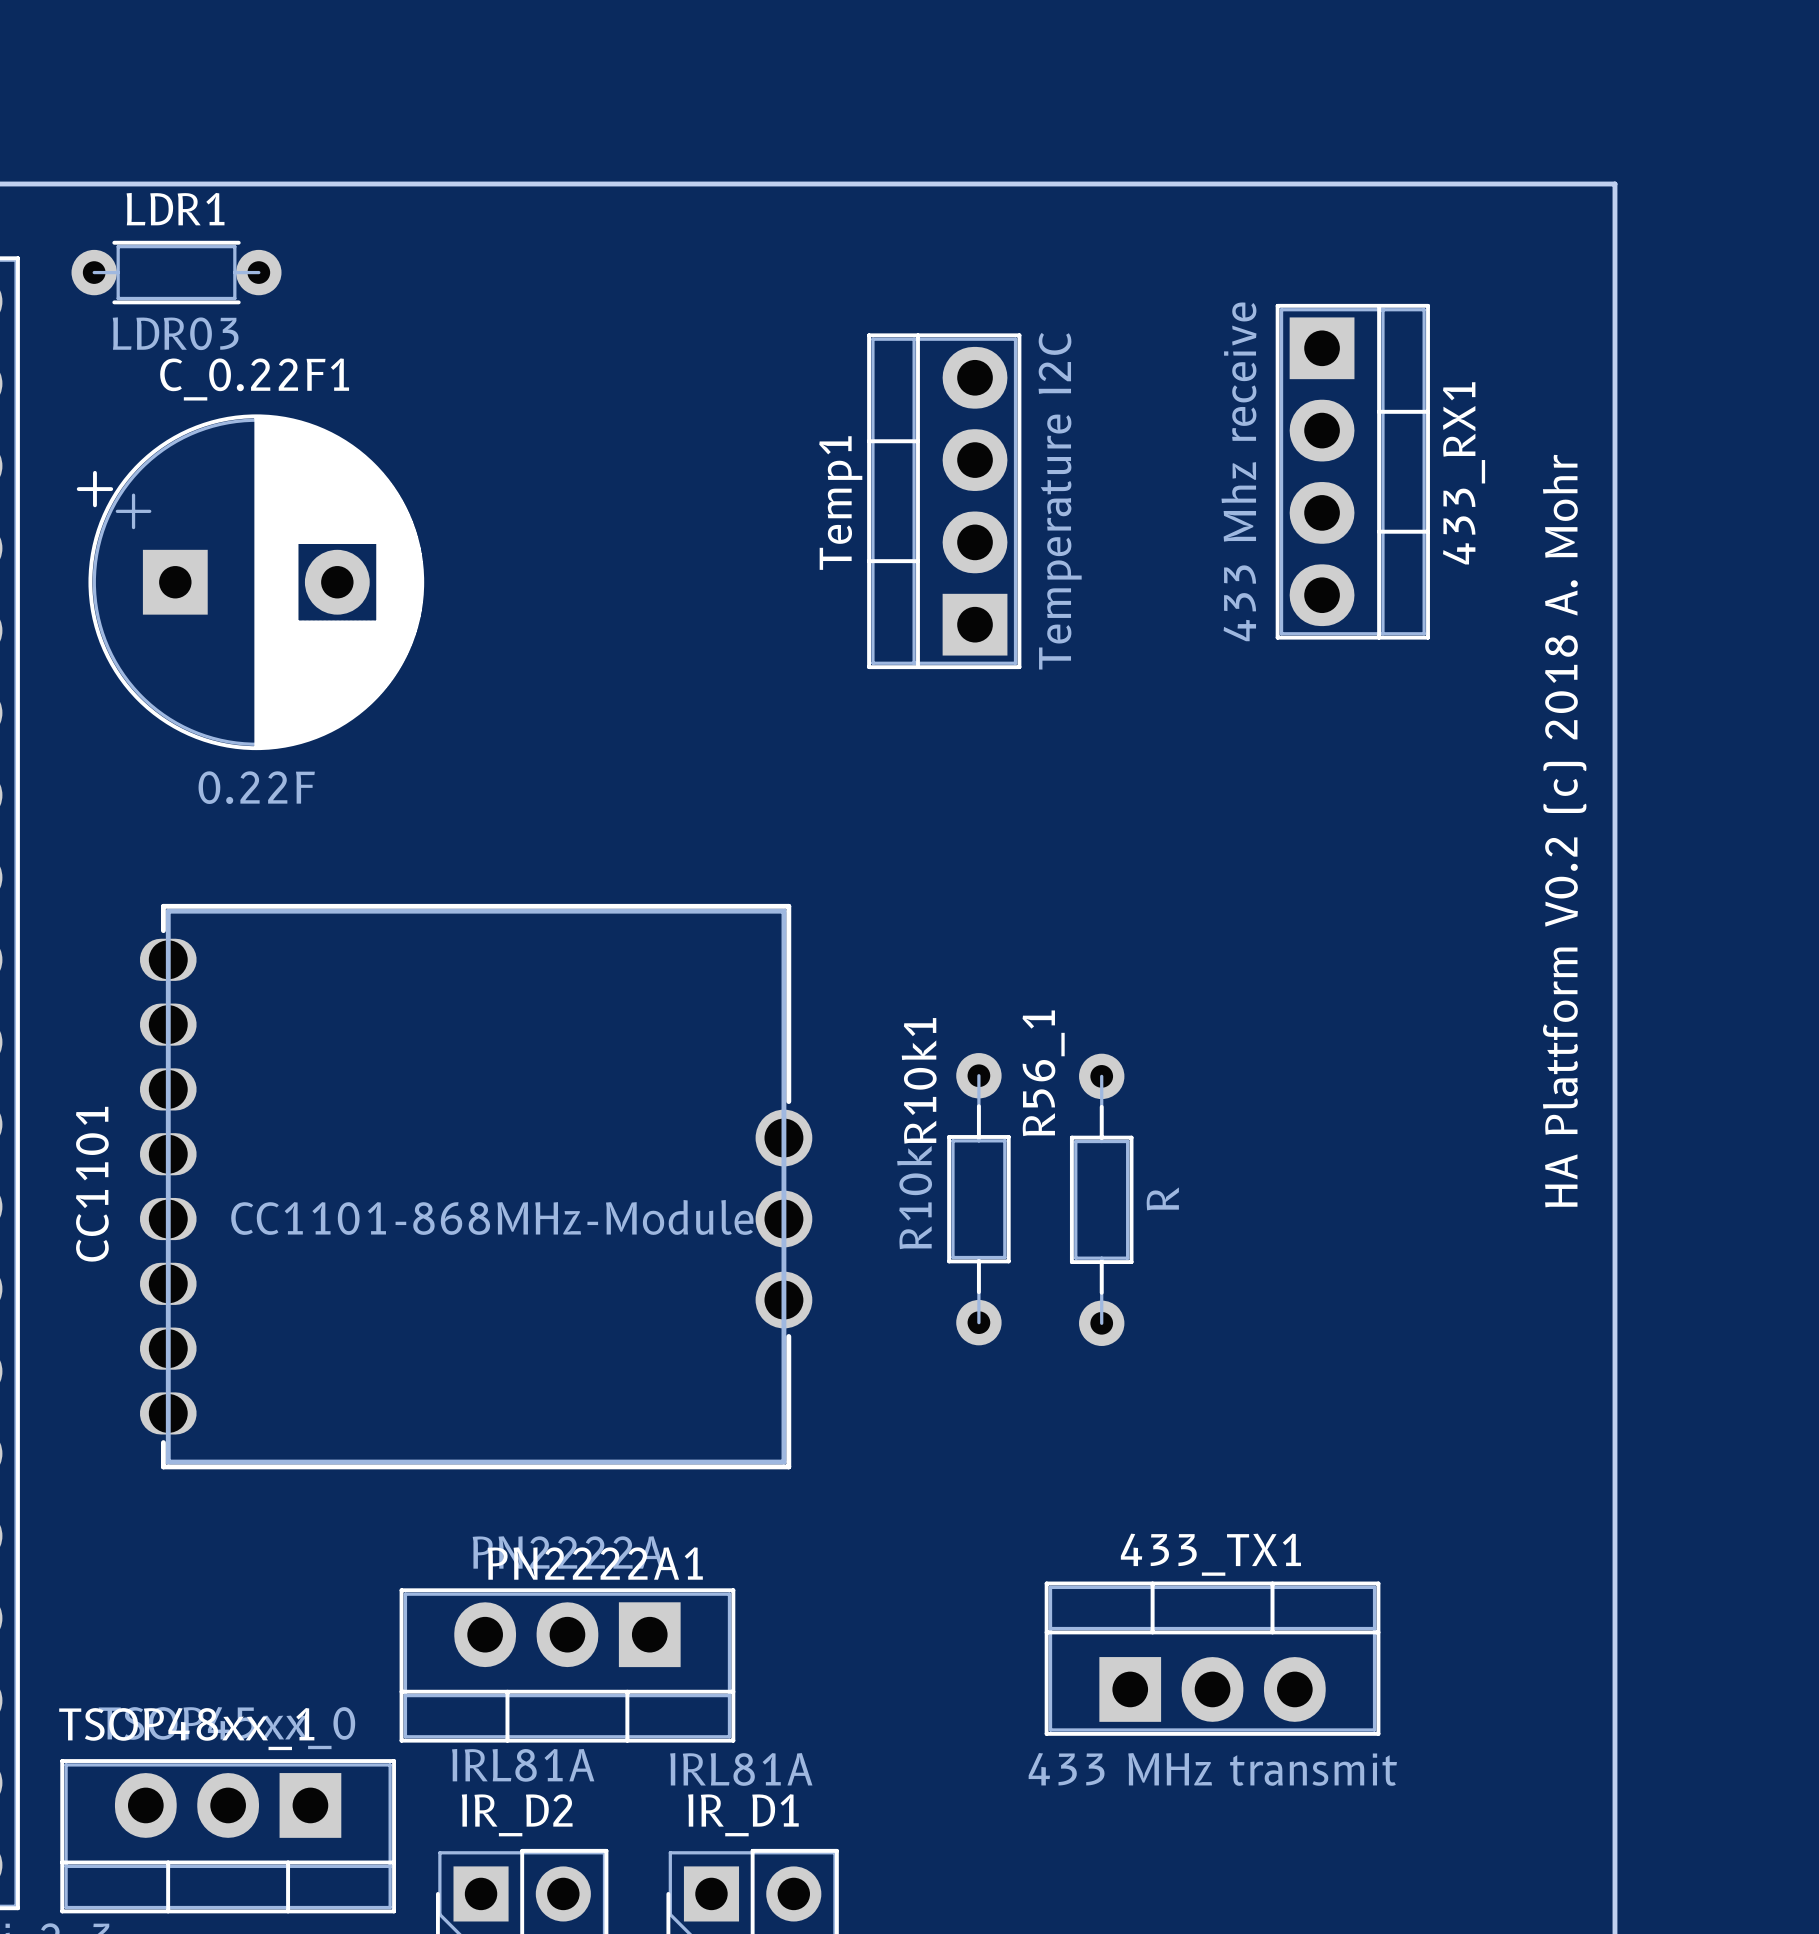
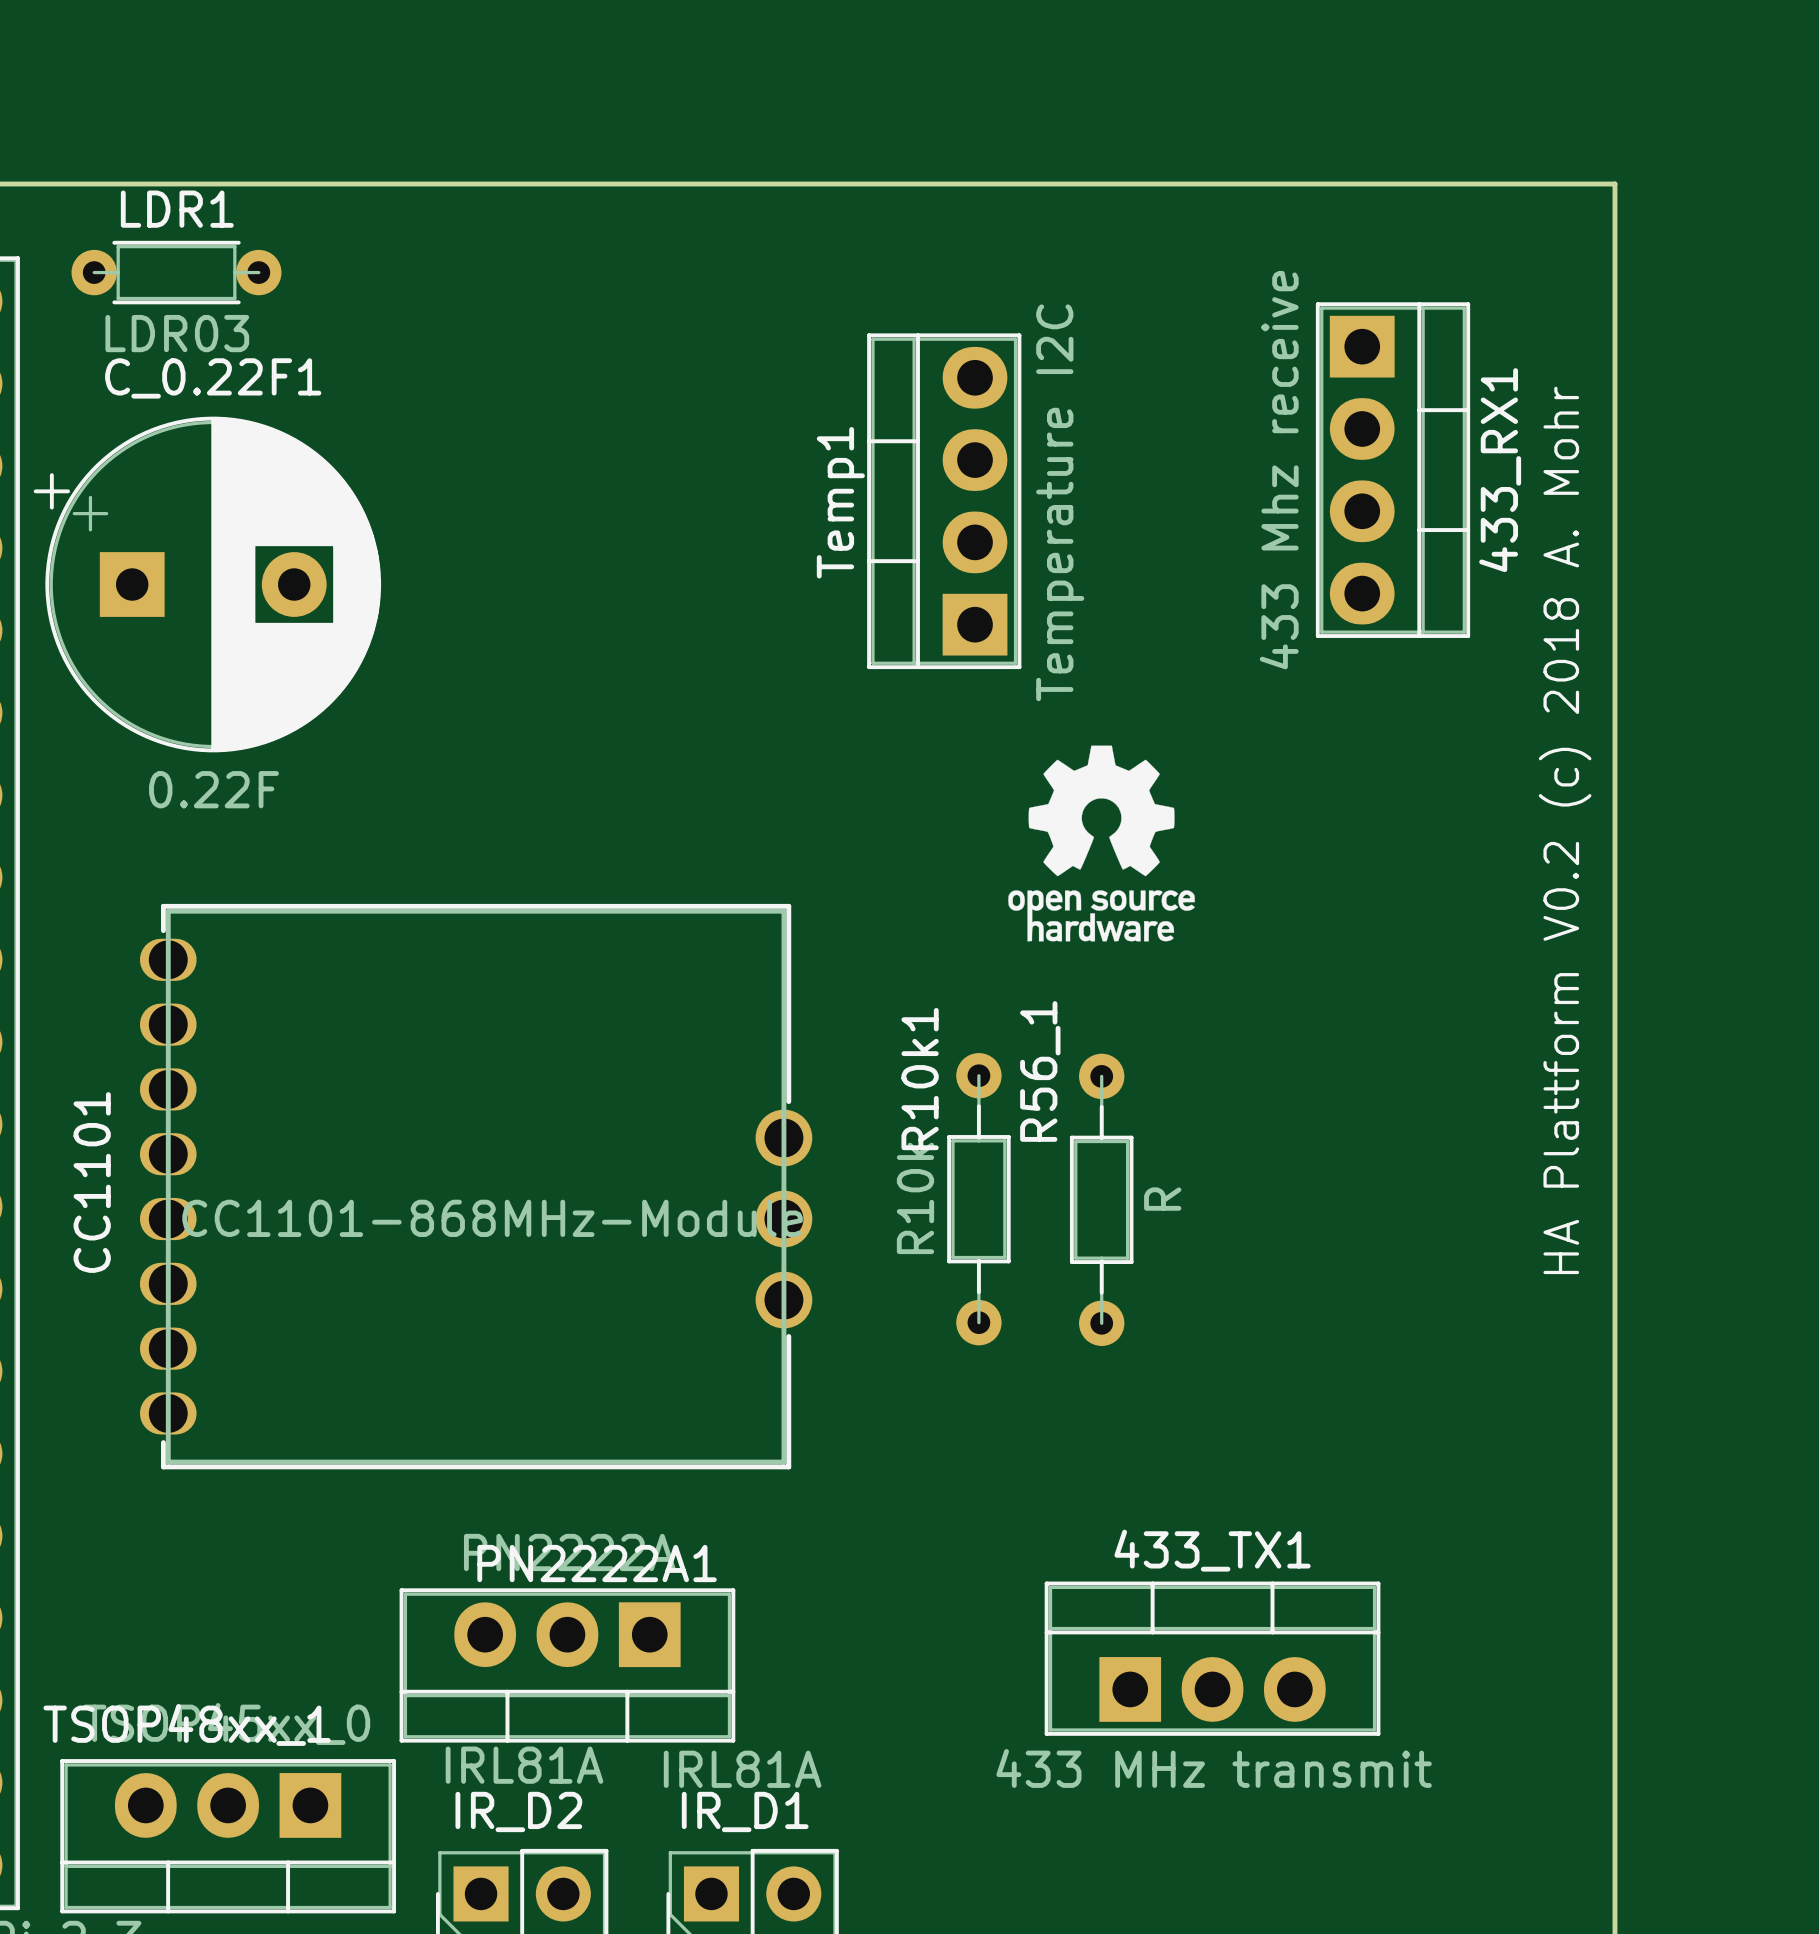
433_RX1 position: (1352, 471) -> (1393, 470)
C_0.22F1 position: (250, 582) -> (207, 584)
drawing: none -> [1008, 745, 1195, 942]

